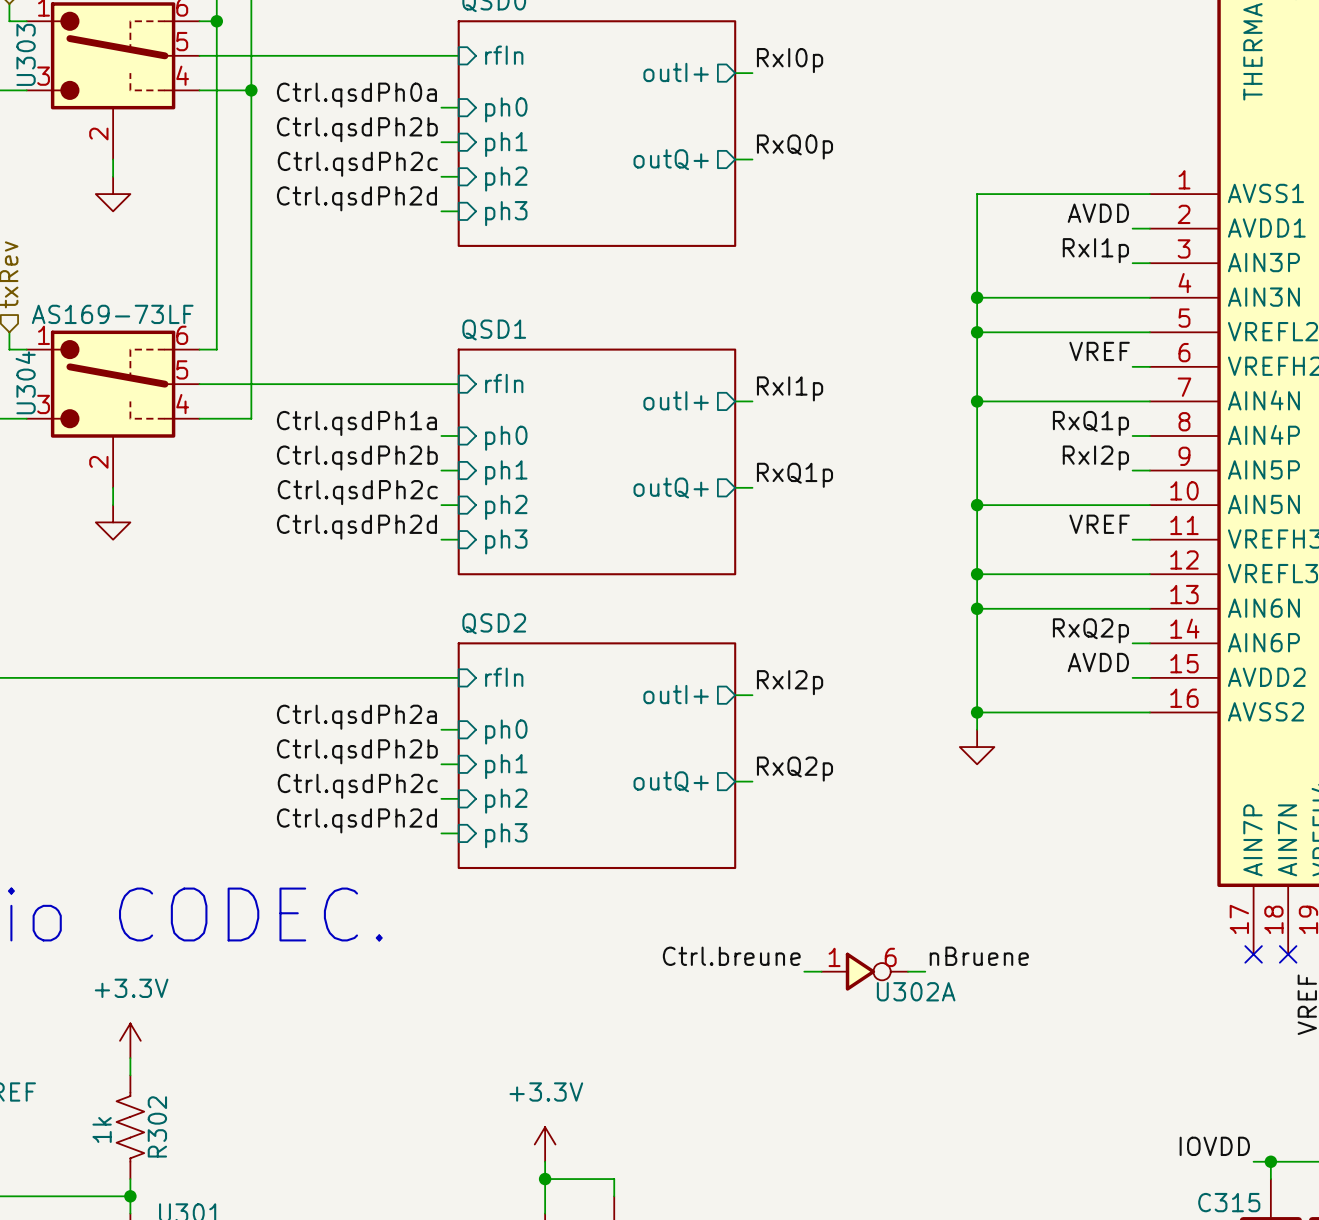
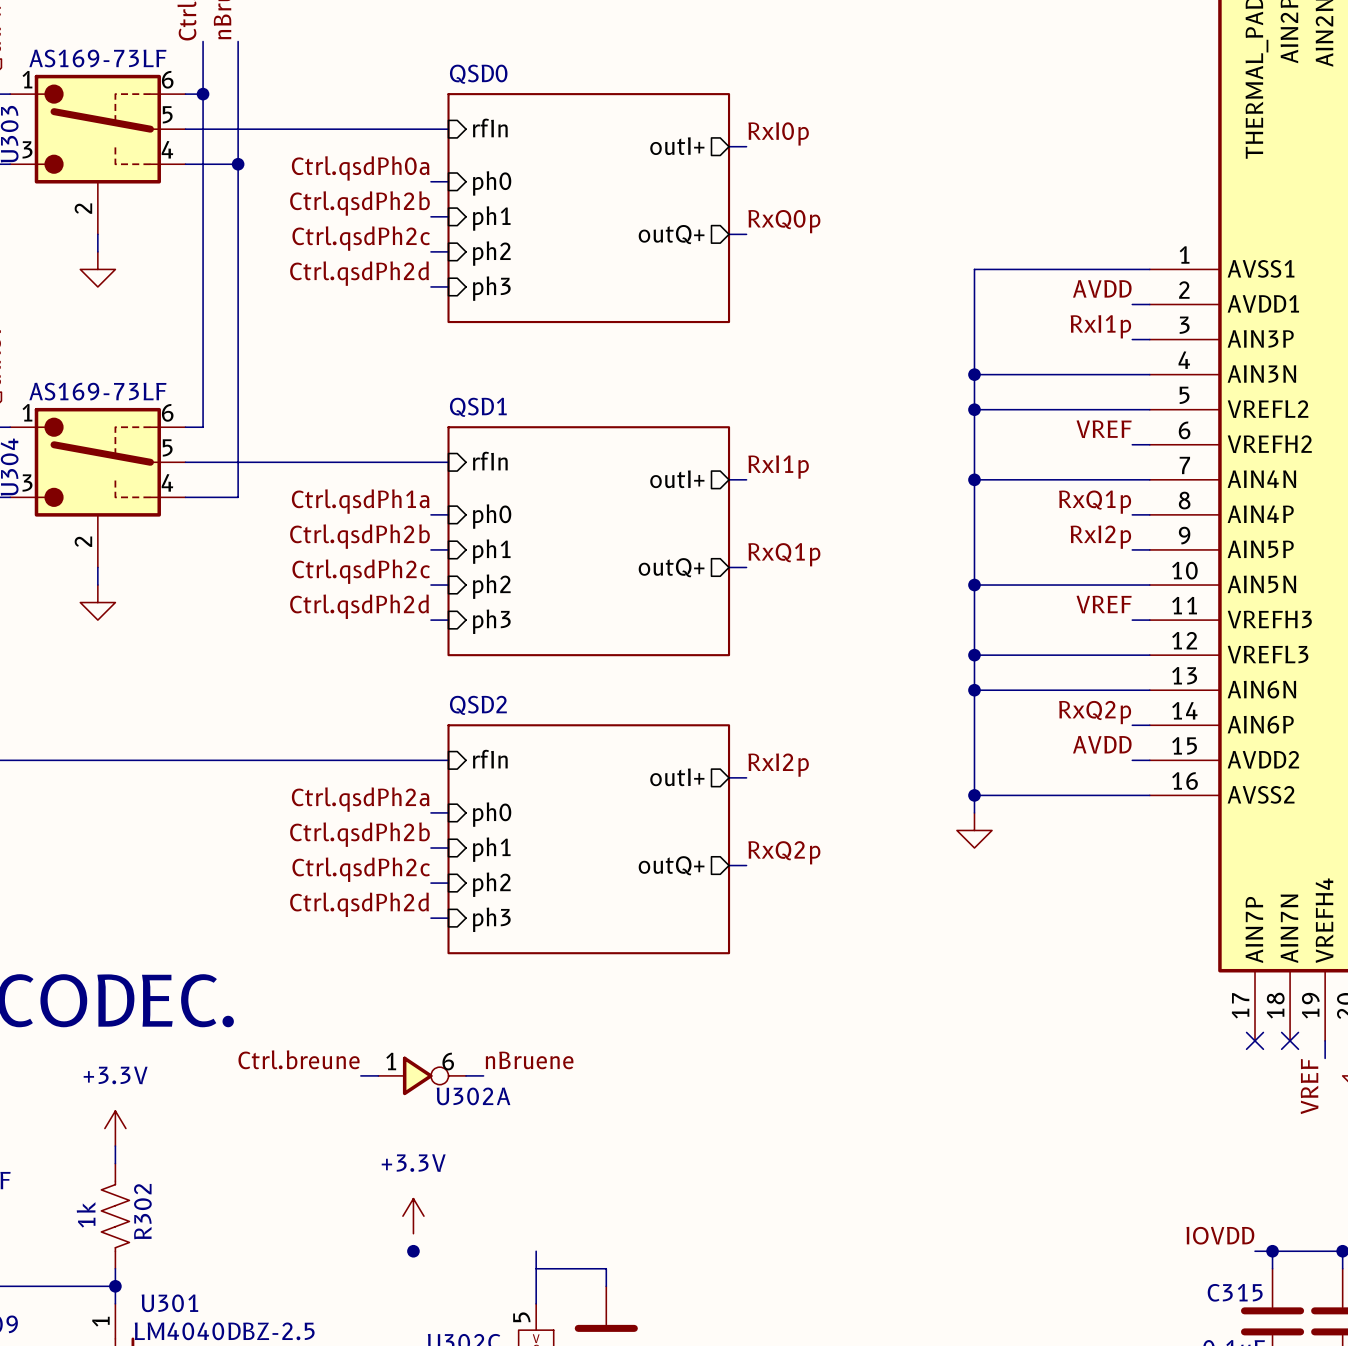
label: Ctrl.breune (731, 956) -> none
label: nBruene (979, 956) -> none
wire: (804, 971) (821, 971) -> (466, 1075) (483, 1075)
U302A position: (864, 971) -> (422, 1075)
wire: (907, 971) (925, 971) -> none
label: none -> Ctrl.breune (299, 1059)
label: none -> nBruene (529, 1060)
wire: none -> (360, 1075) (378, 1075)
power symbol position: +3.3V (545, 1144) -> +3.3V (413, 1216)
junction: none -> (413, 1251)
junction: (545, 1179) -> none

